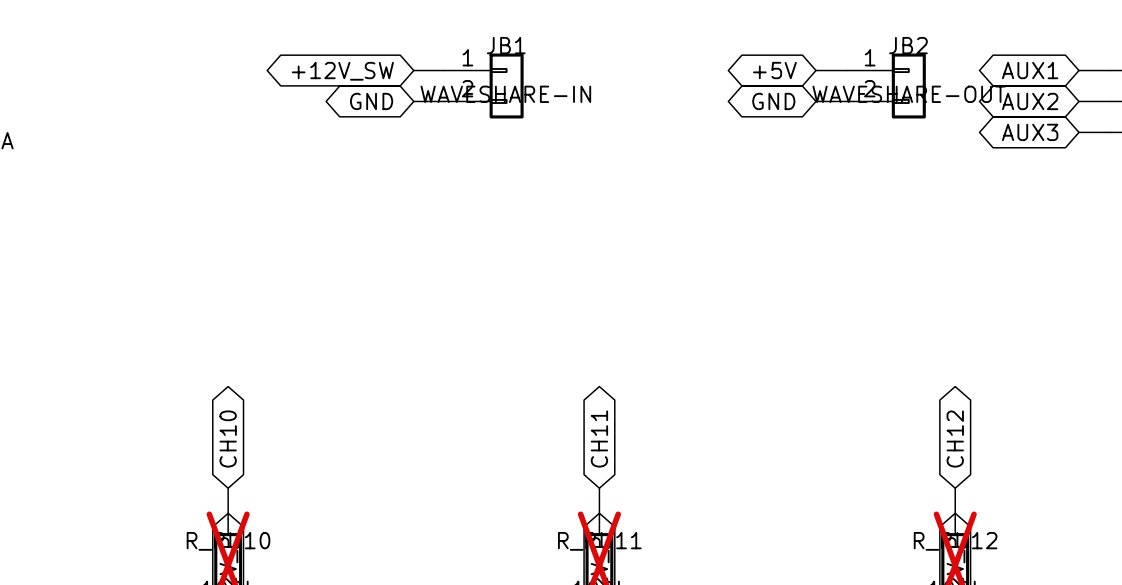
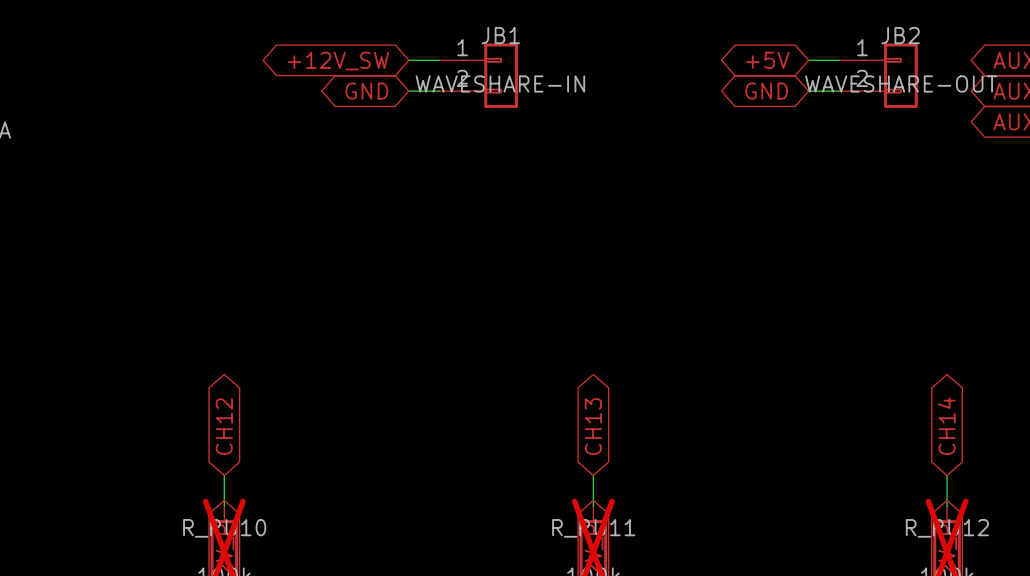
global label: CH10 (228, 439) -> CH12 (224, 426)
global label: CH11 (599, 439) -> CH13 (593, 426)
global label: CH12 (955, 439) -> CH14 (946, 426)

